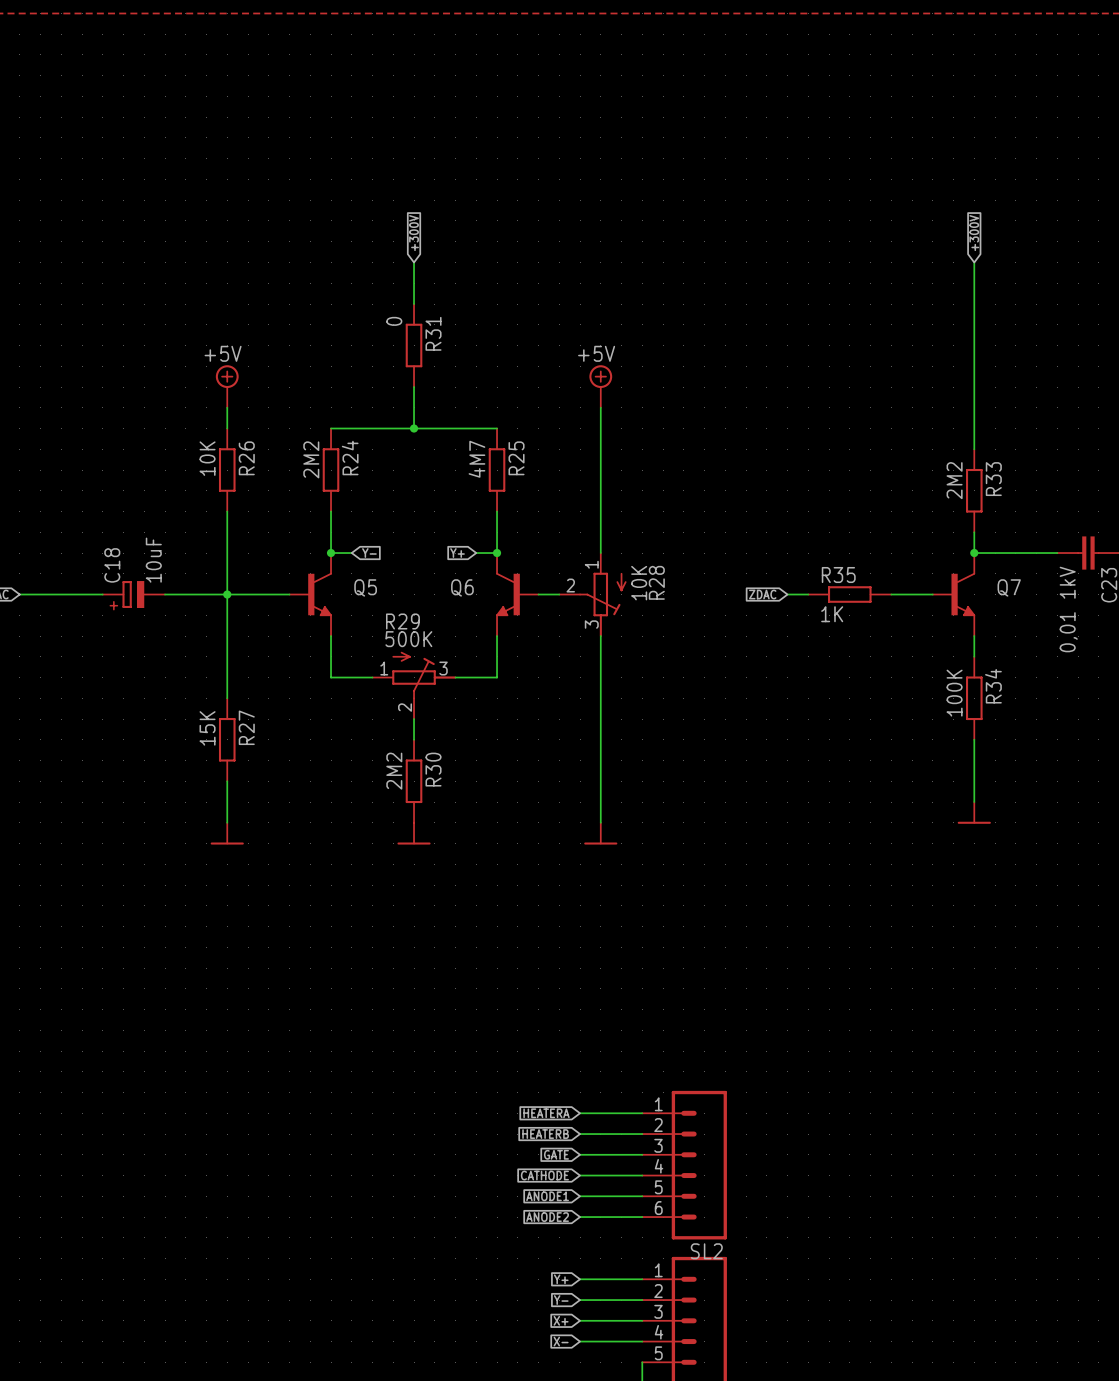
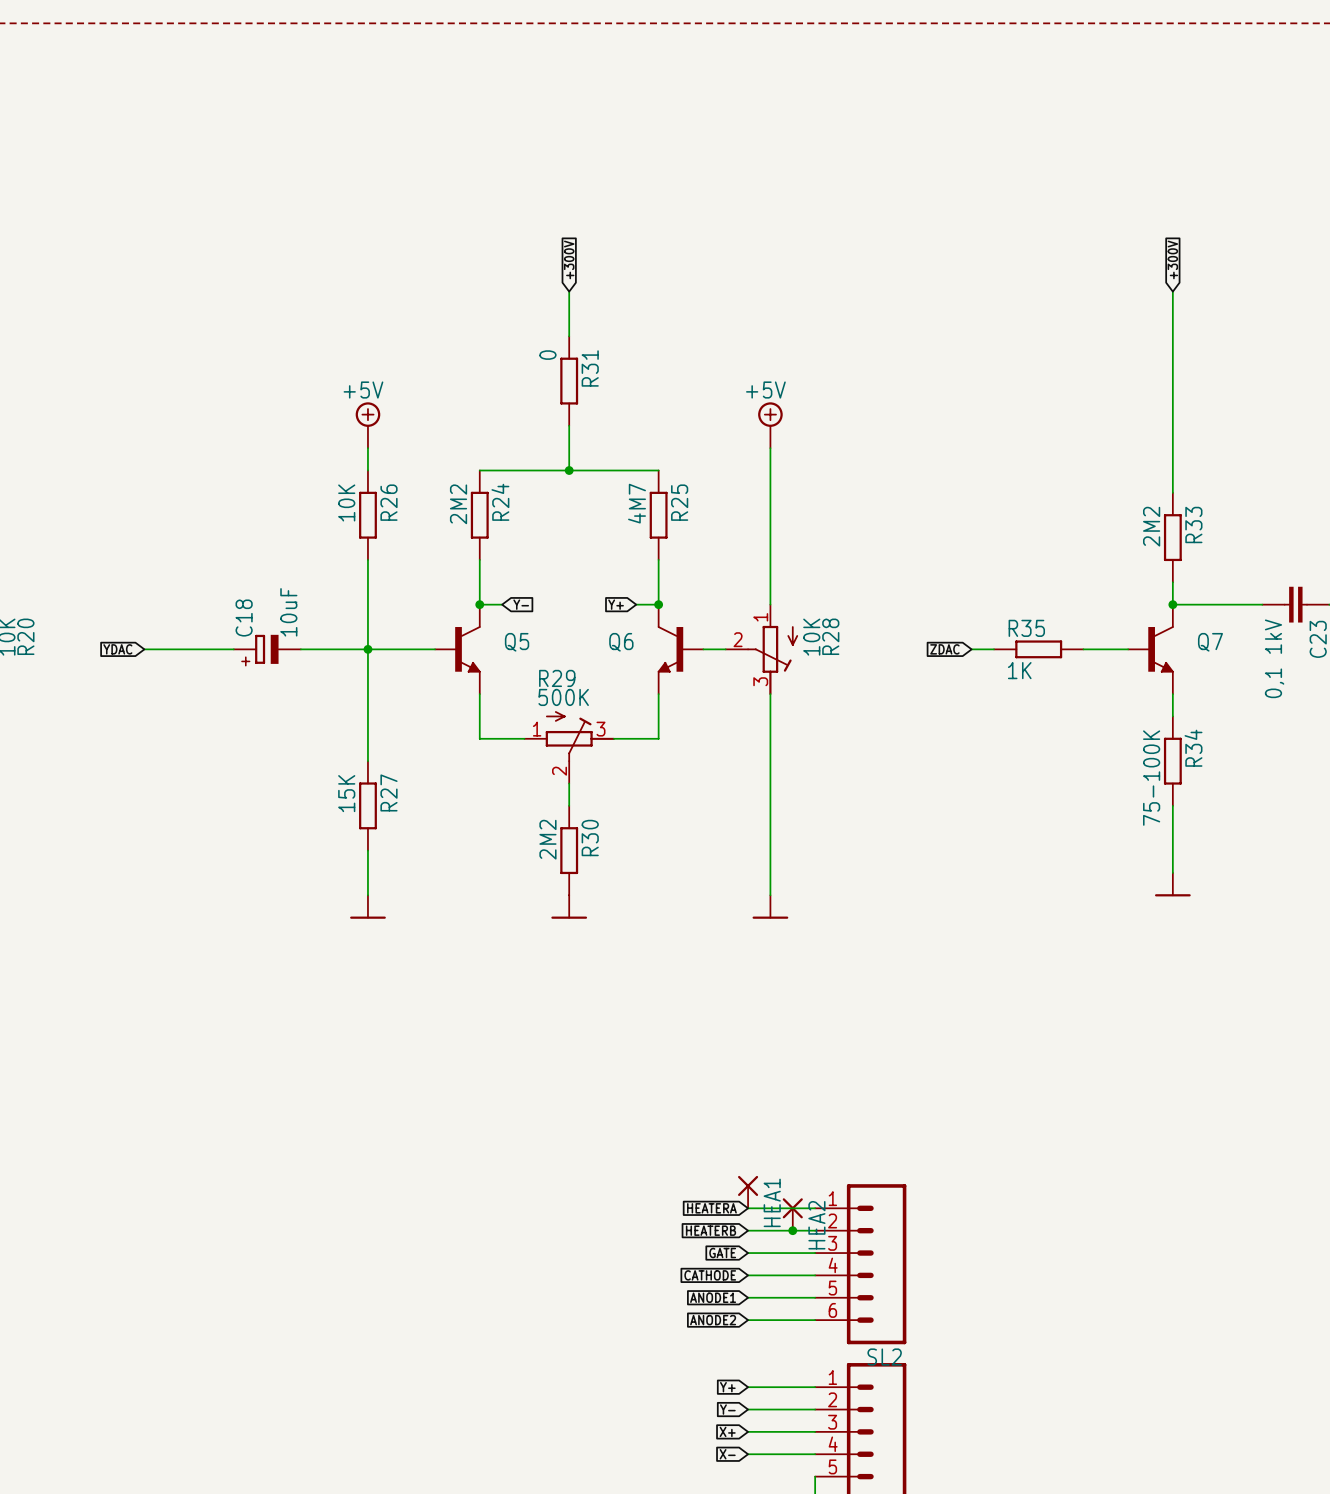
C23 value: 0,01 1kV (1068, 609) -> 0,1 1kV (1274, 658)
R34 value: 100K (954, 693) -> 75-100K (1151, 778)
HEA1: none -> (748, 1192)
HEA2: none -> (792, 1214)
junction: none -> (792, 1230)

